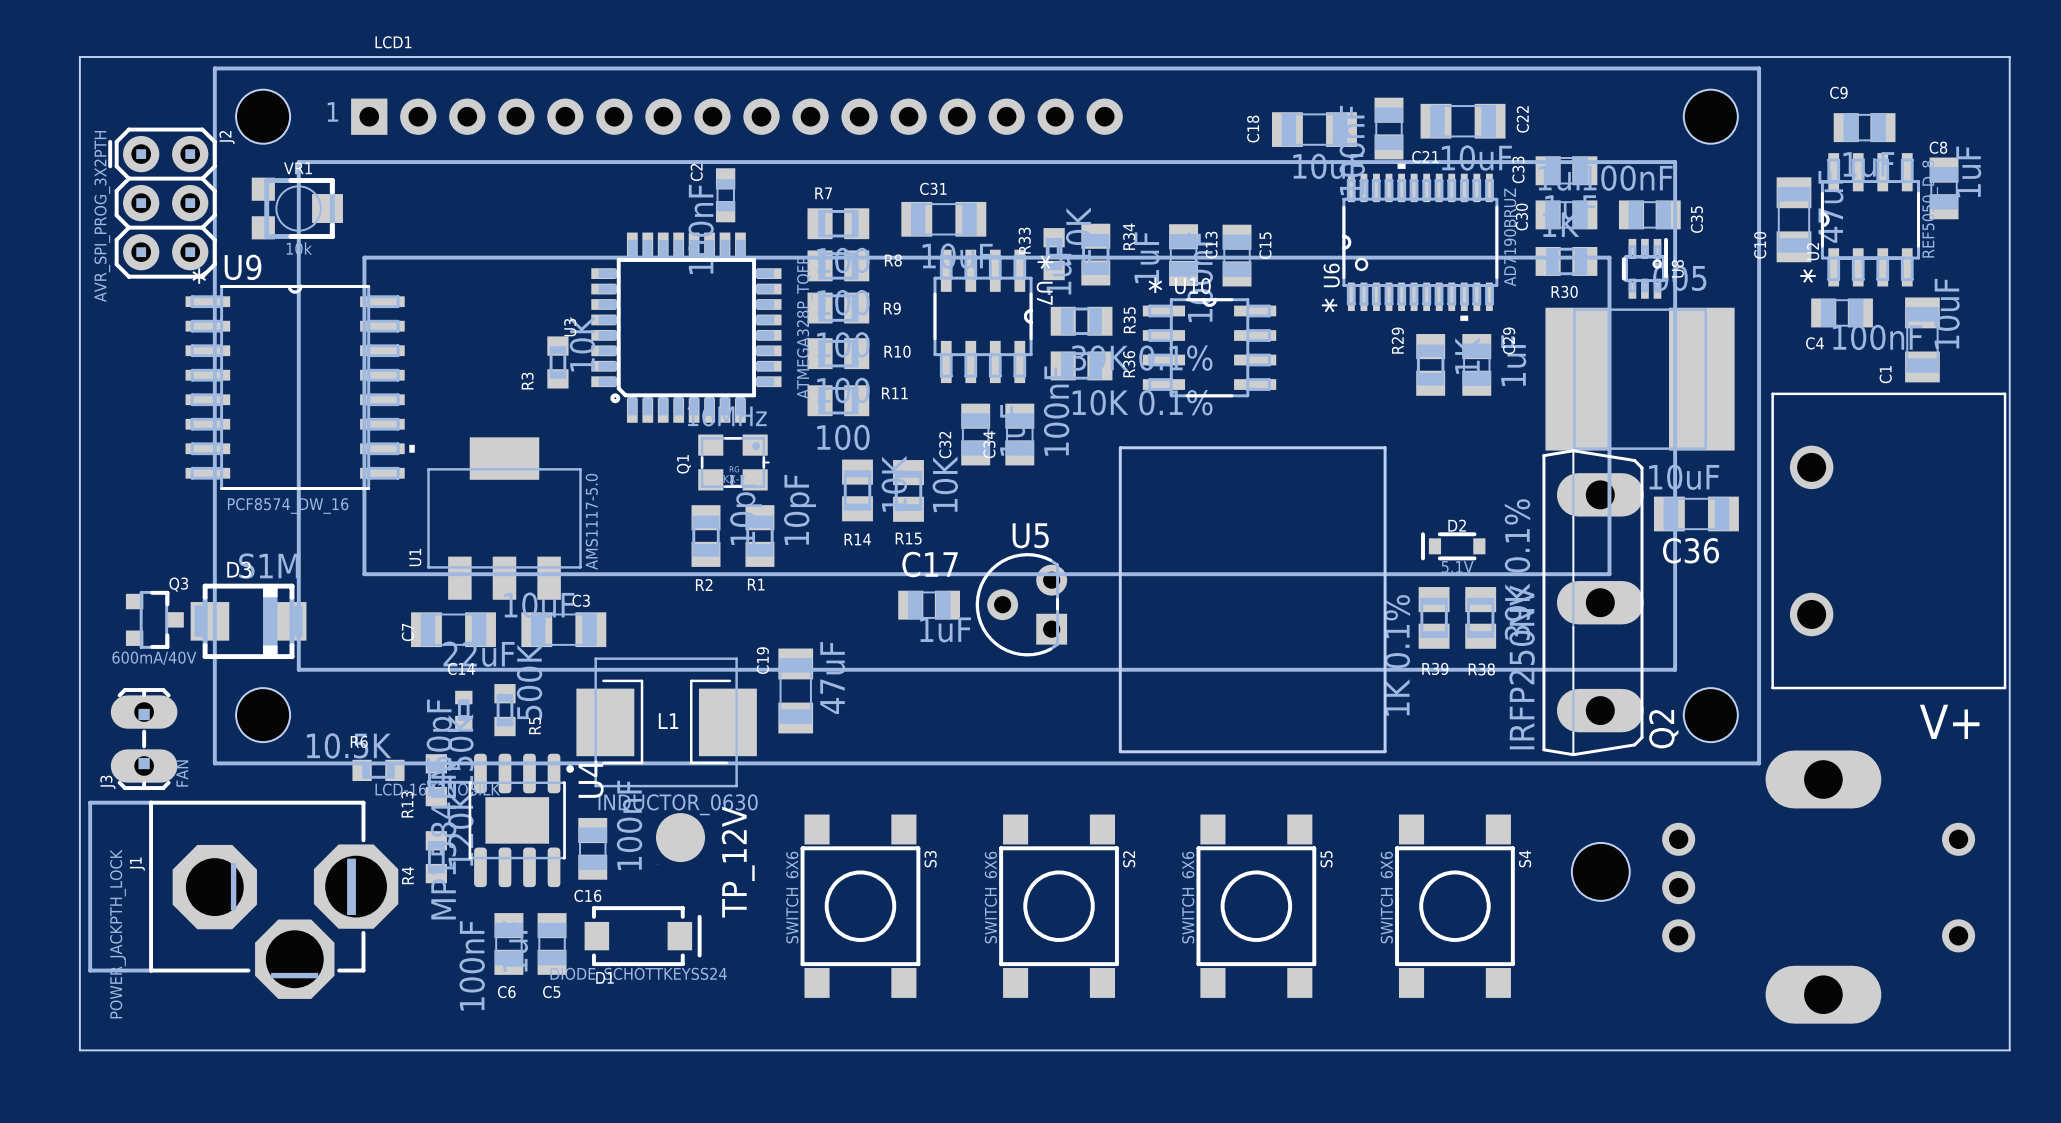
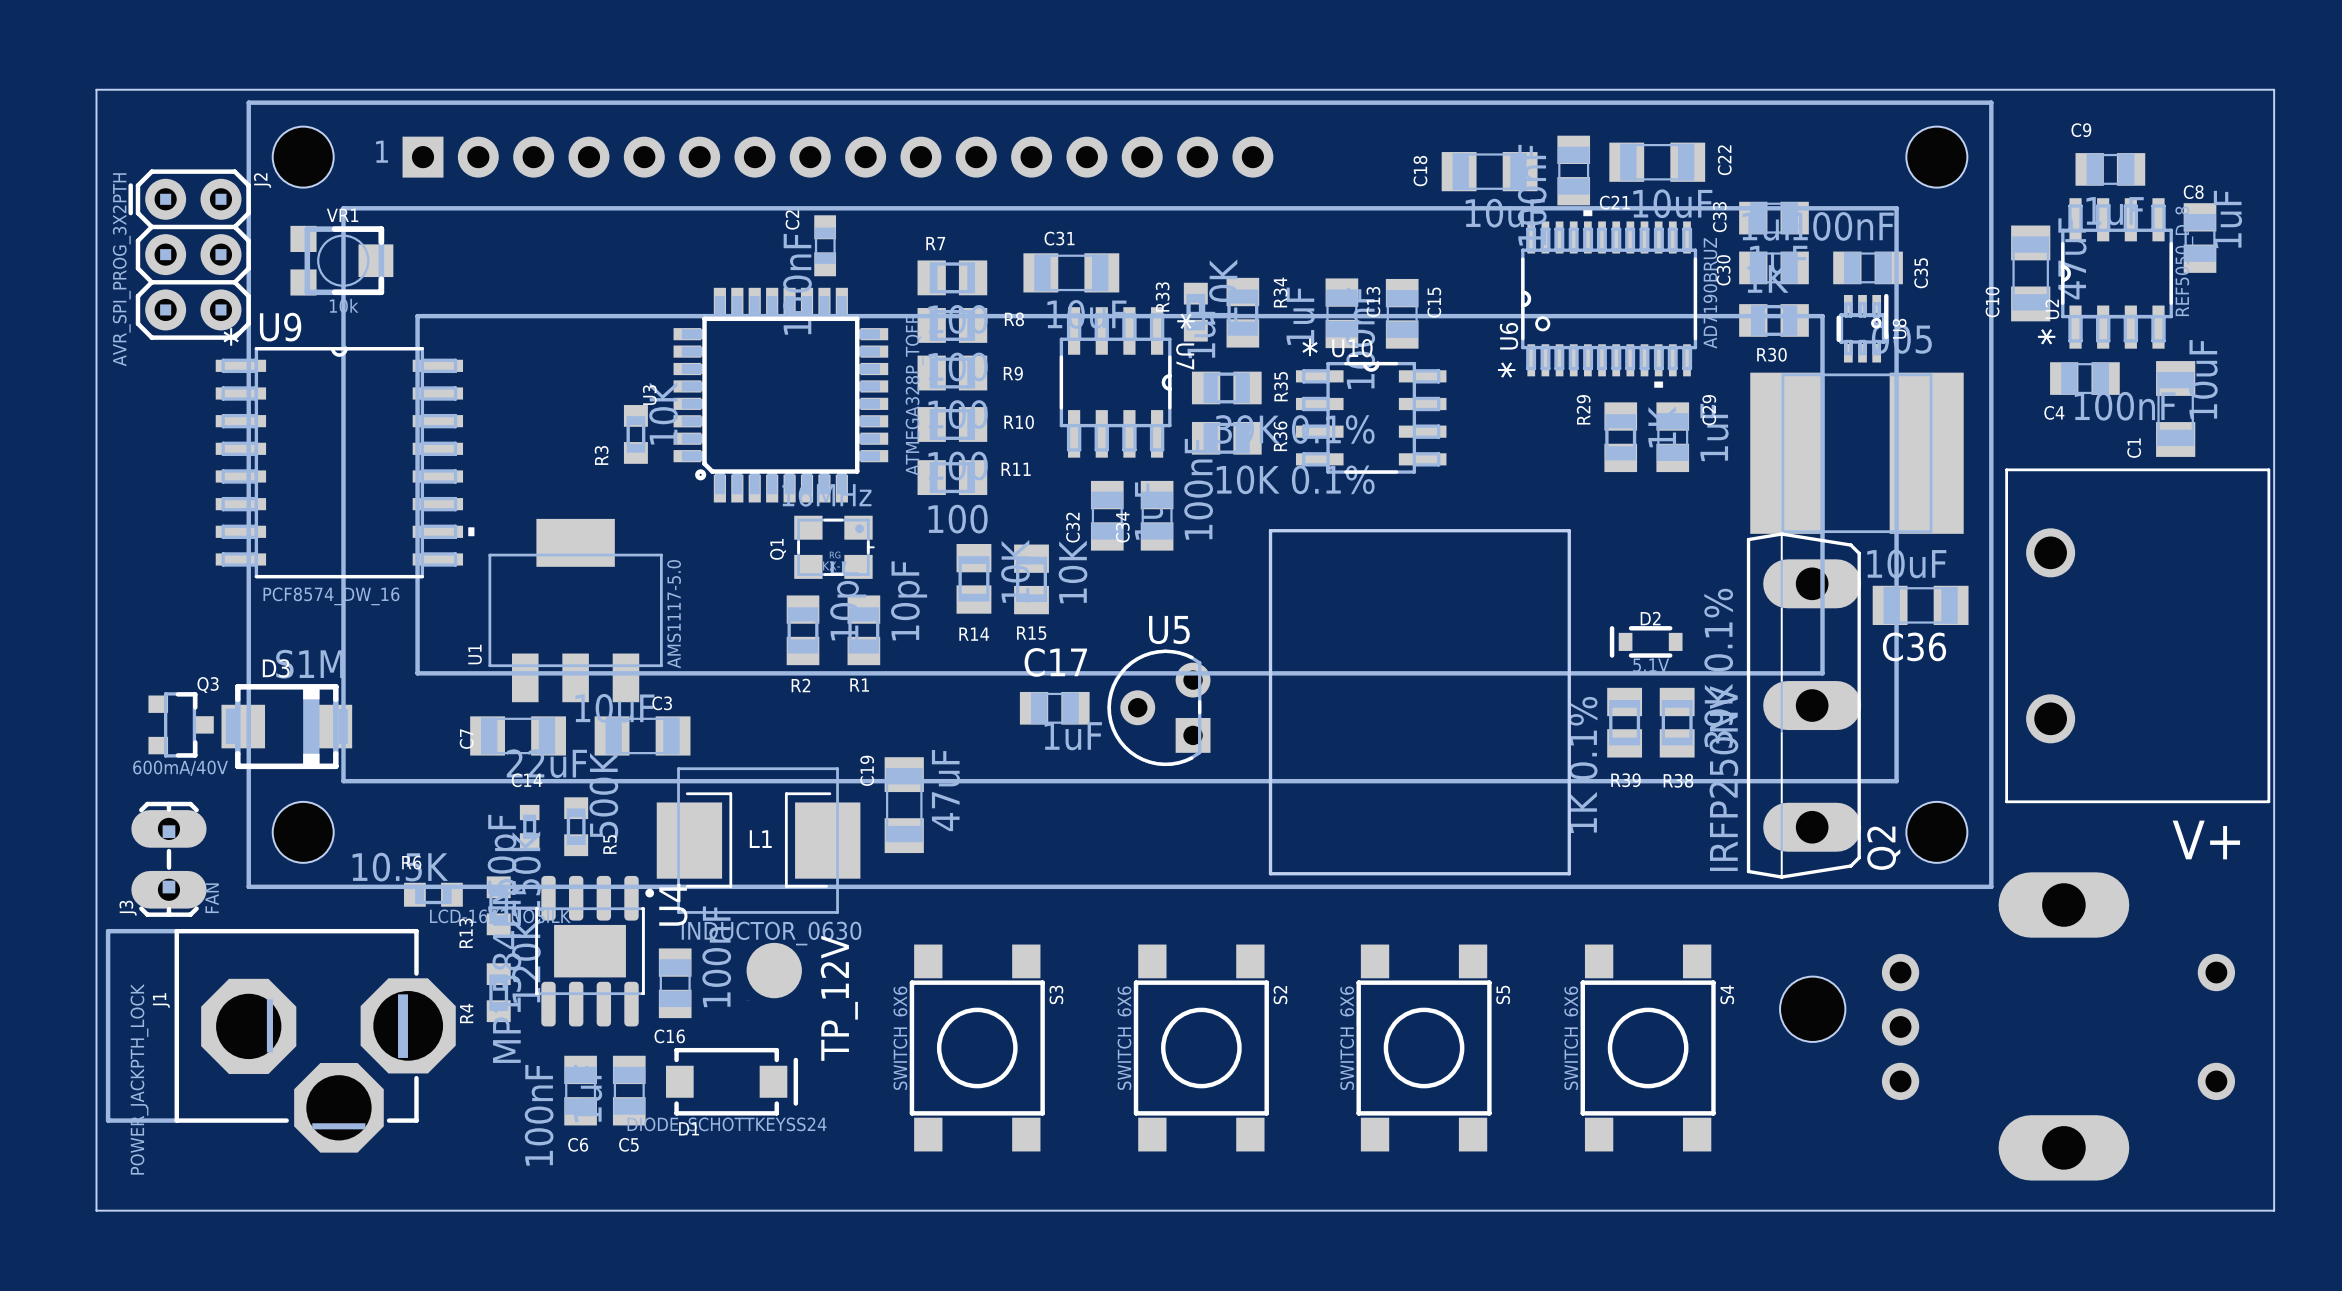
LCD1 name: LCD1 (393, 42) -> none

